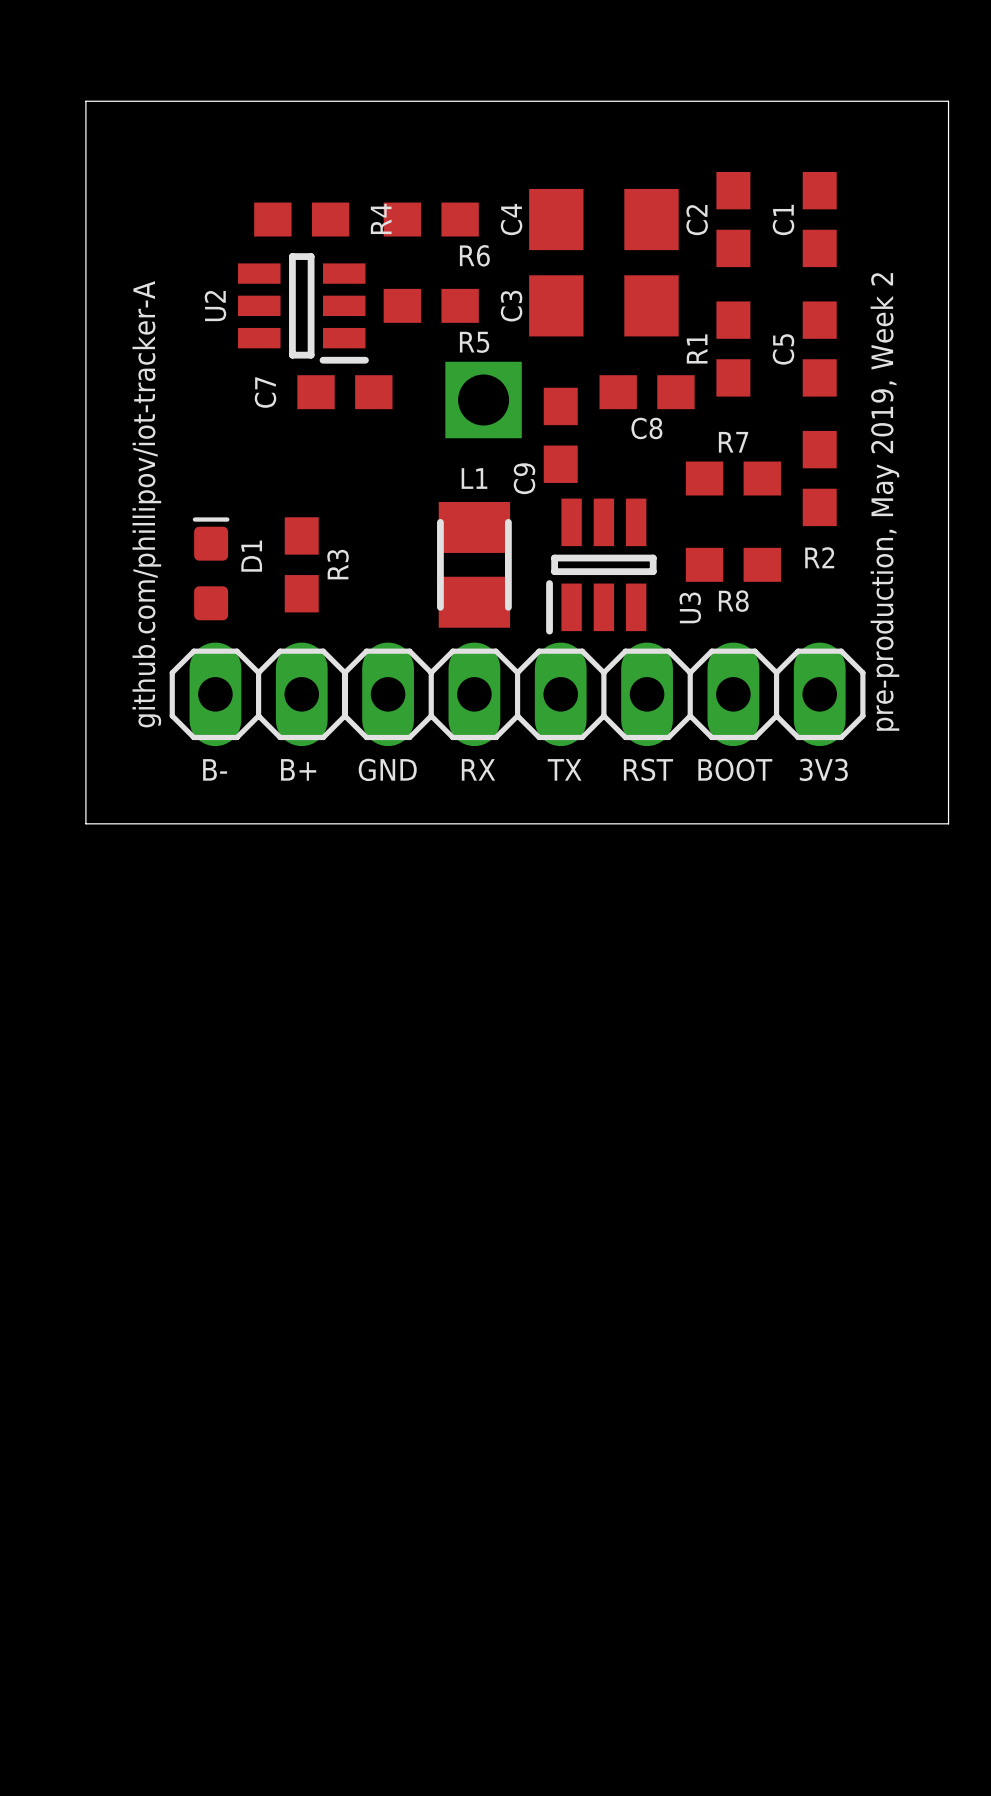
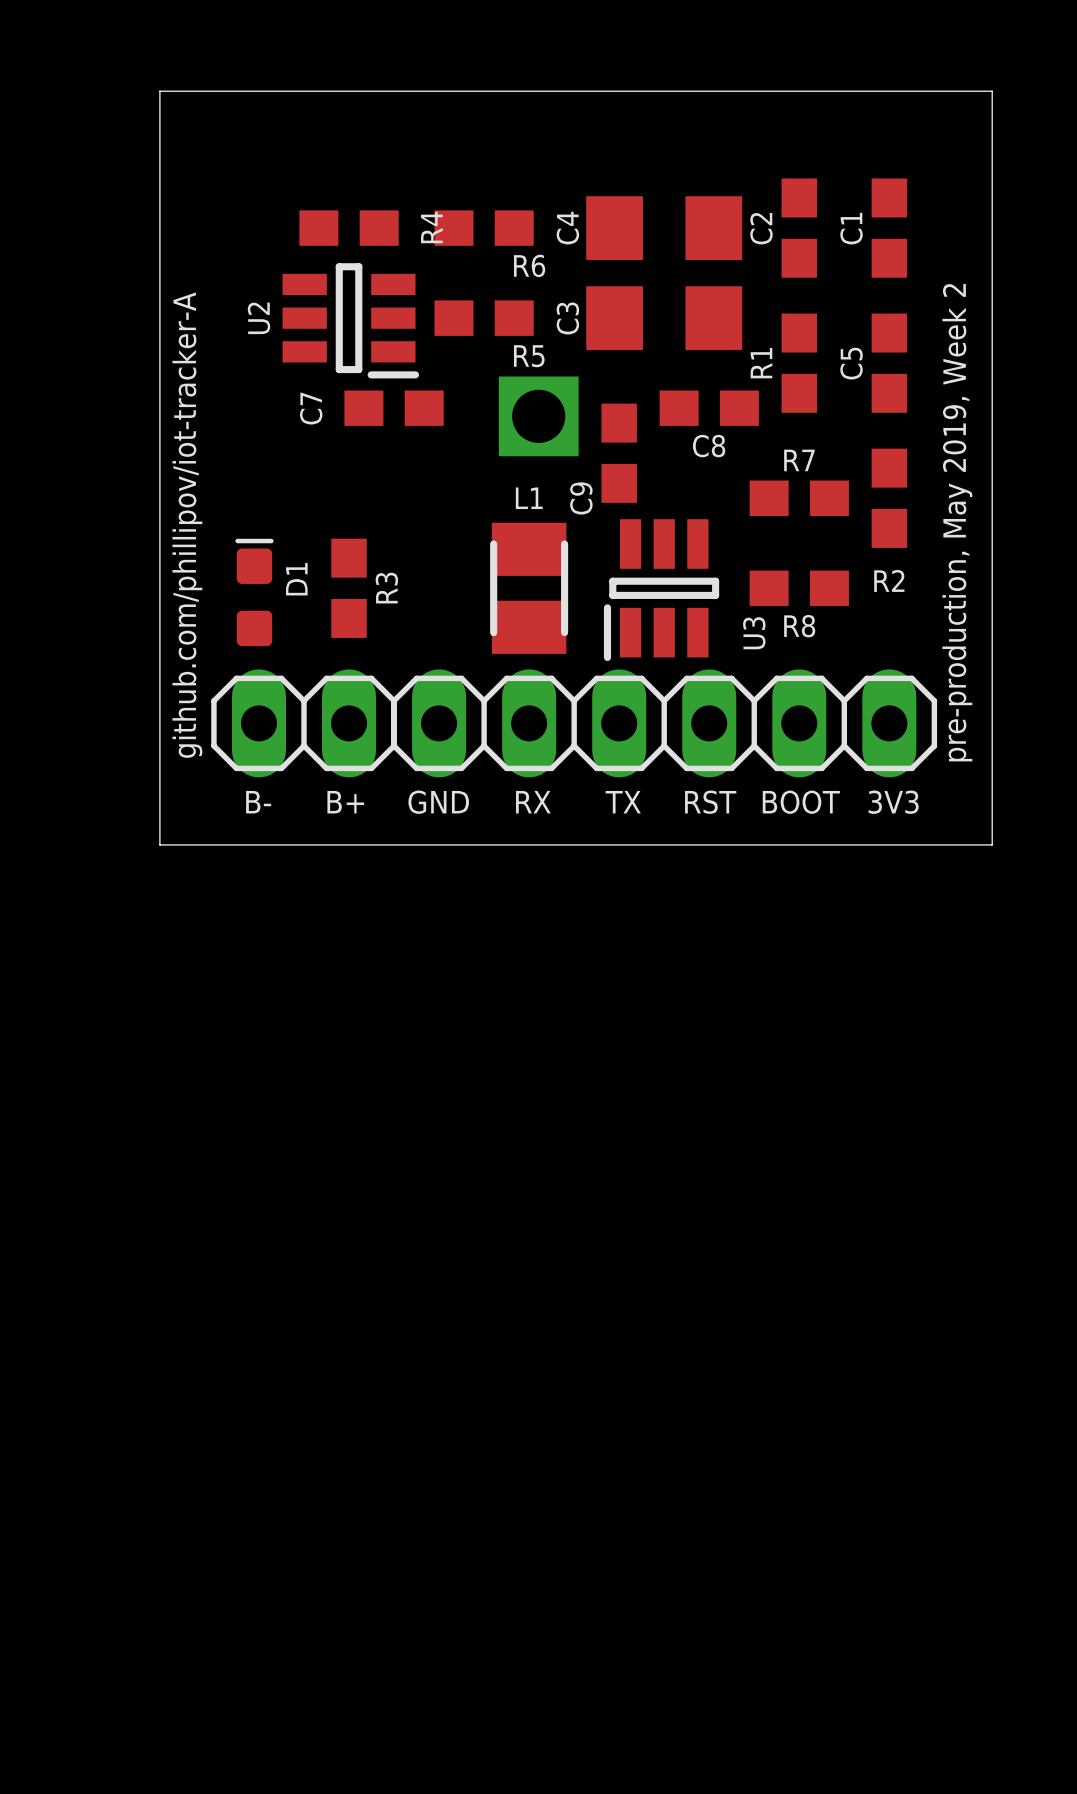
board edge: (85, 101) (948, 101) (948, 823) (85, 823) (85, 101) -> (159, 91) (159, 844) (992, 844) (992, 91) (159, 91)

